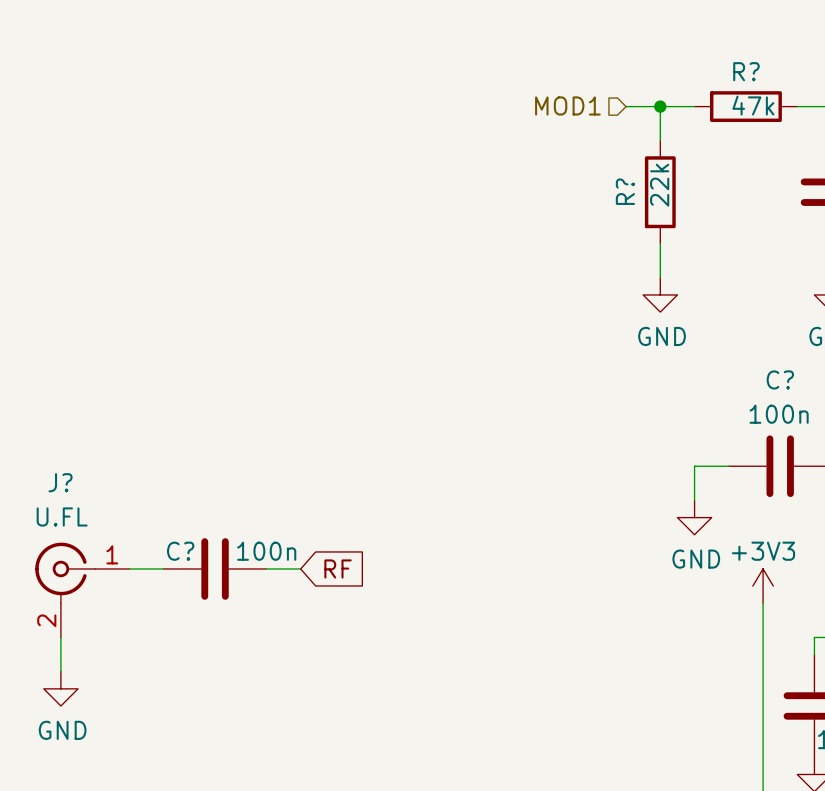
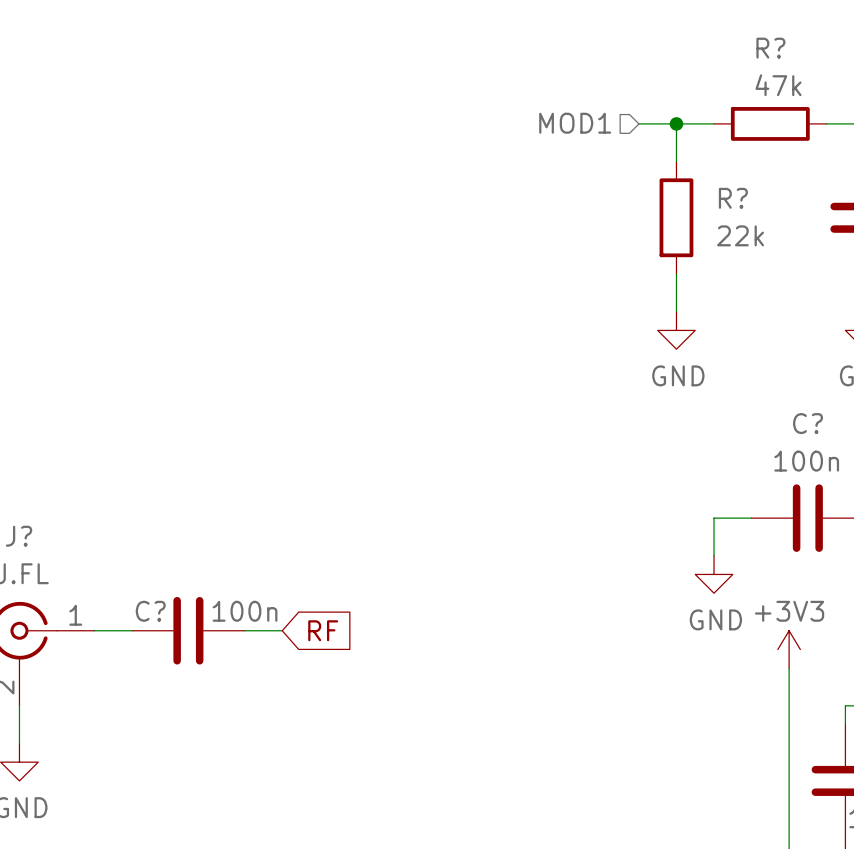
R? name position: R? (746, 71) -> R? (770, 48)
R? value position: 47k (753, 105) -> 47k (778, 85)
R? value rotation: 0° (659, 185) -> 90° clockwise (740, 235)
R? value position: 22k (659, 185) -> 22k (740, 235)
R? name rotation: 0° (625, 191) -> 90° clockwise (733, 198)
R? name position: R? (625, 191) -> R? (733, 198)

